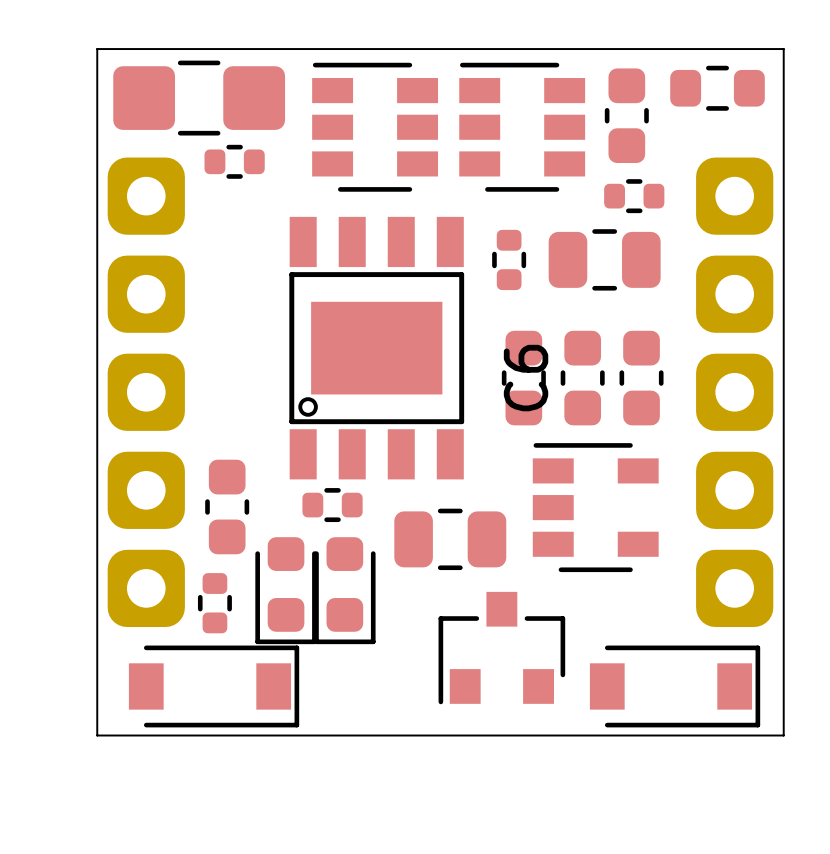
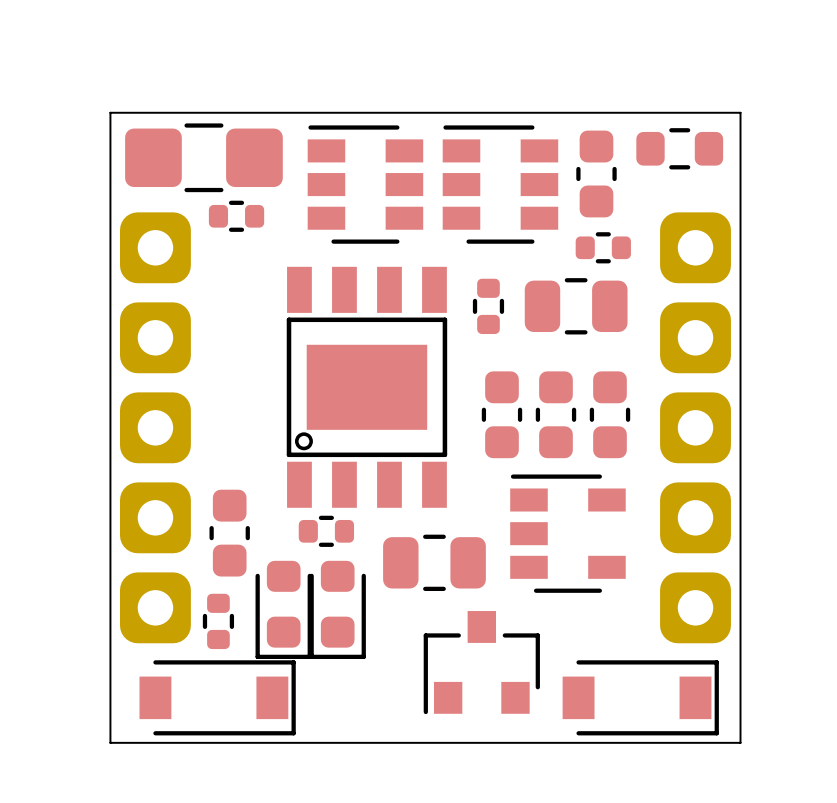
C6 name: C6 (526, 378) -> none

